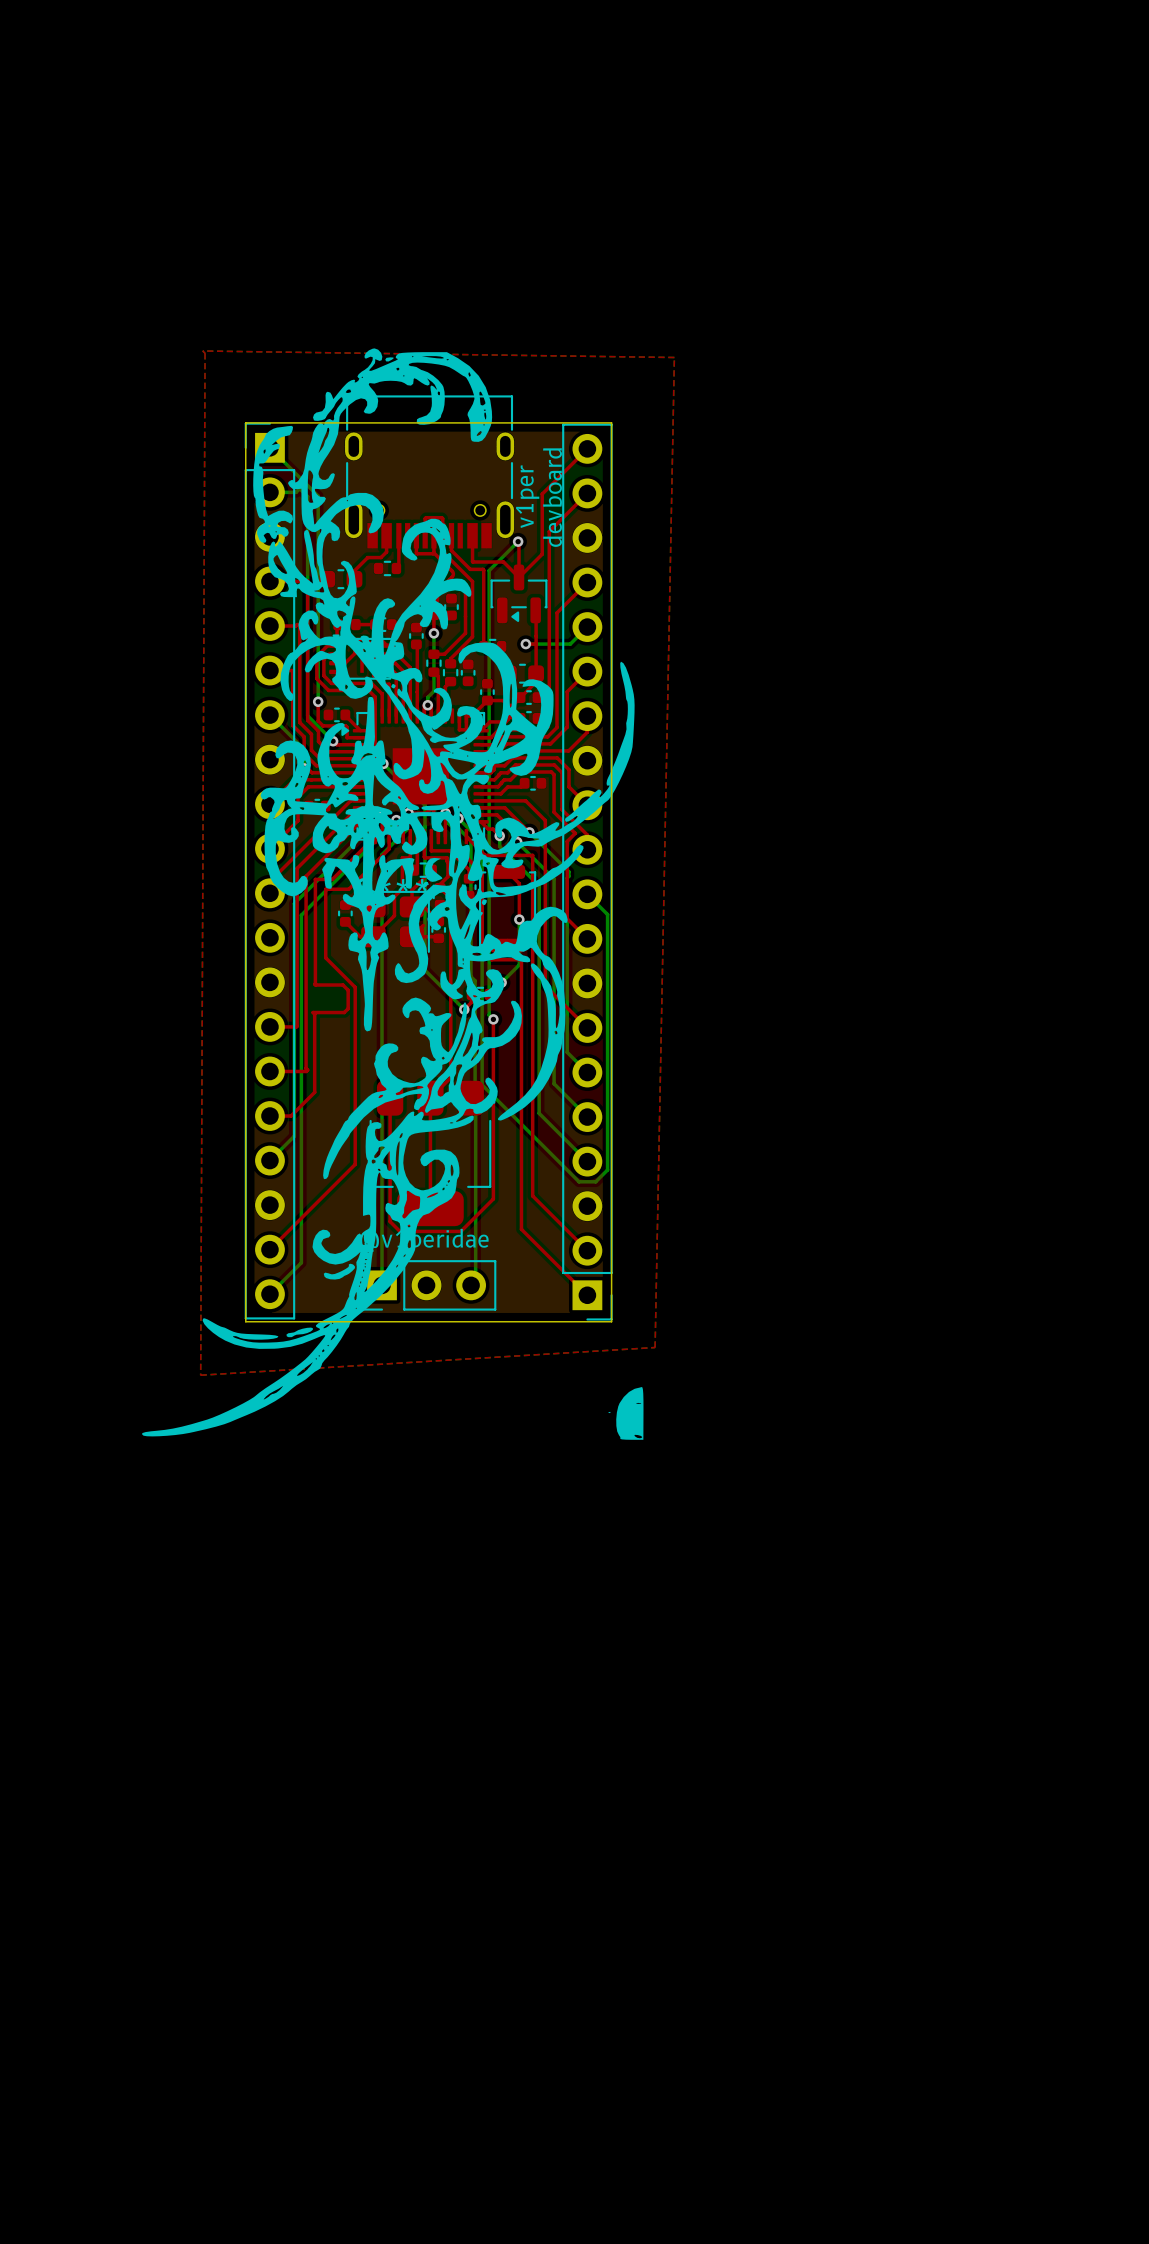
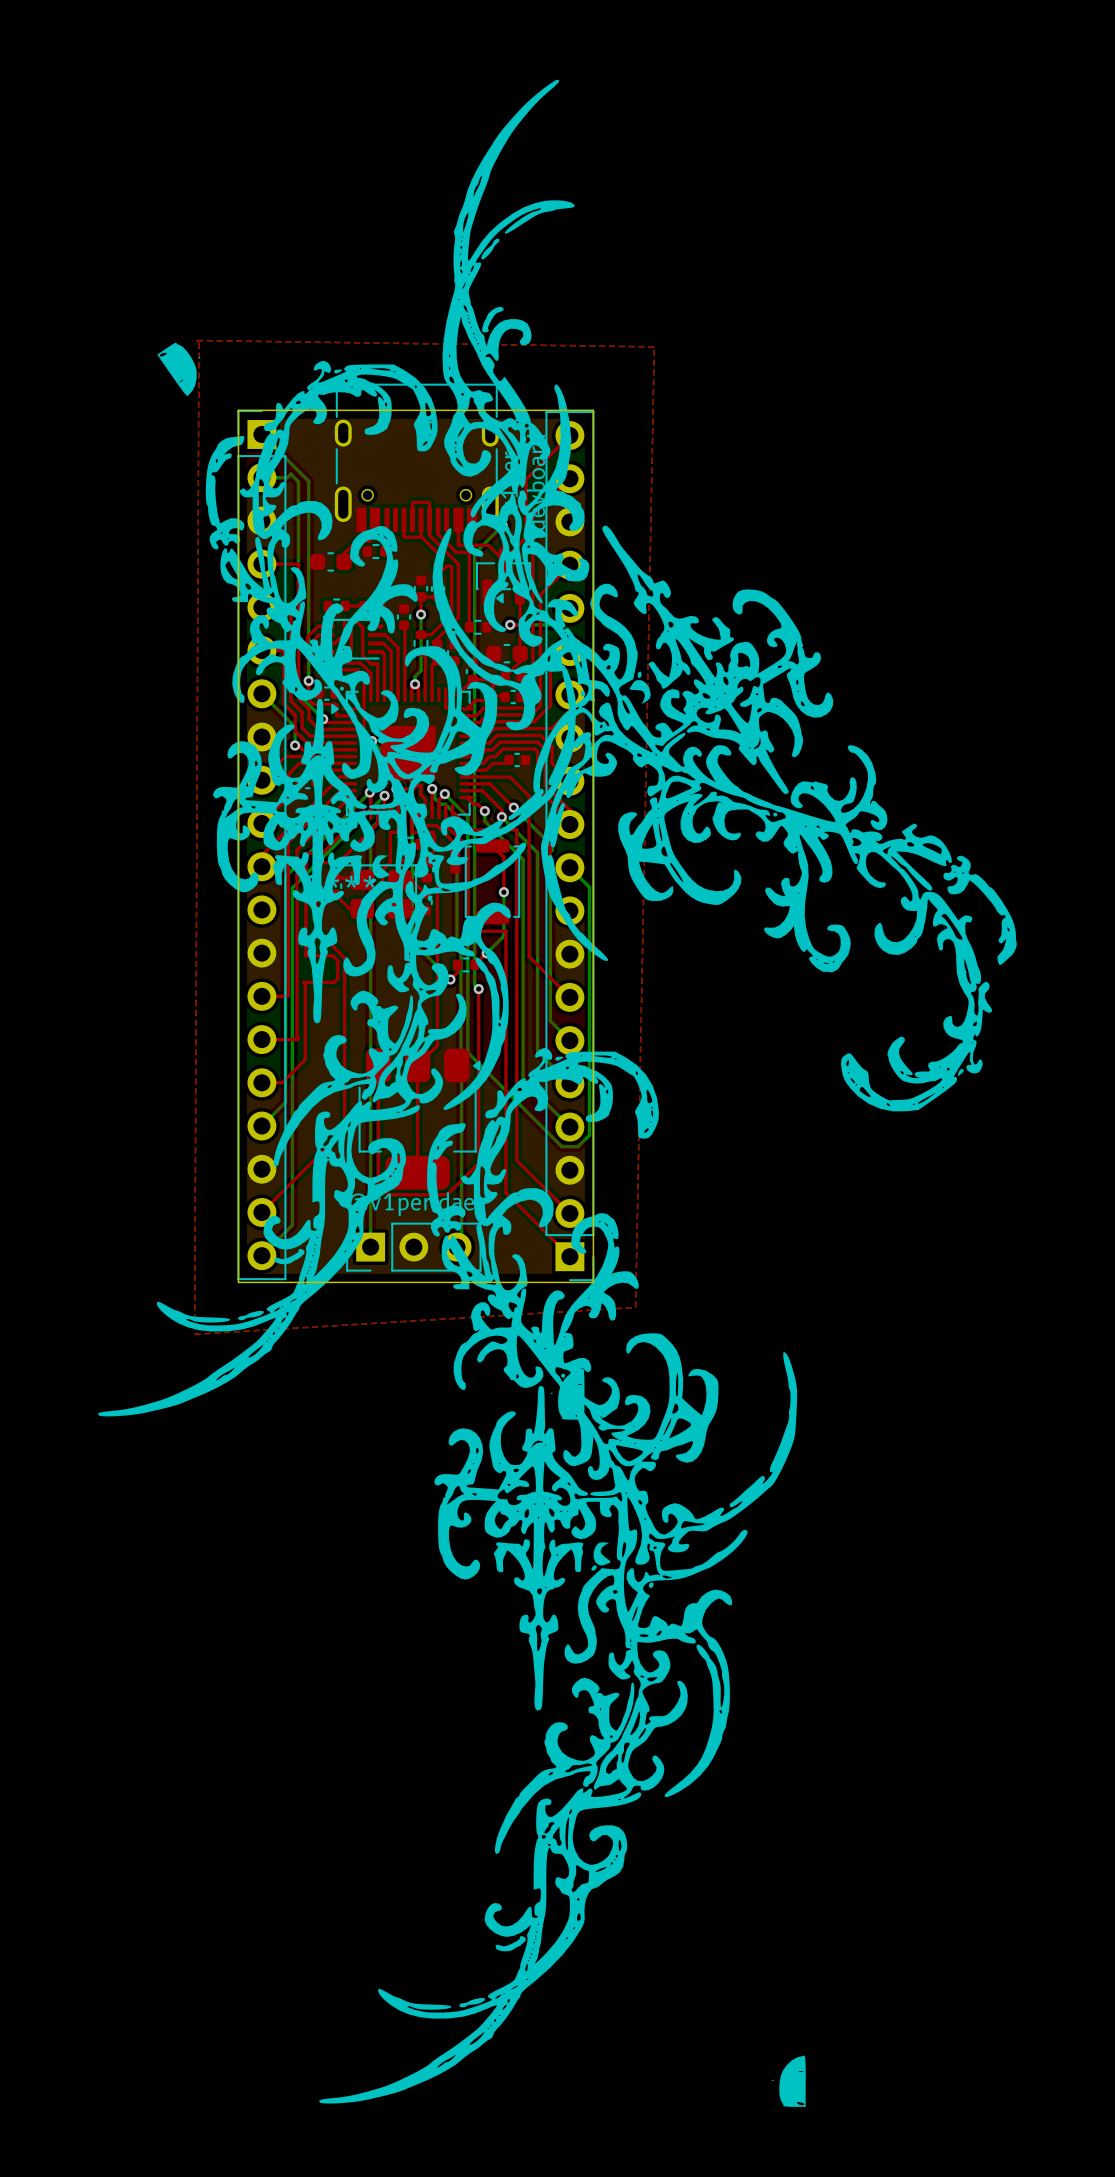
drawing: none -> [157, 79, 1017, 2107]
part position: (392, 894) -> (341, 890)

